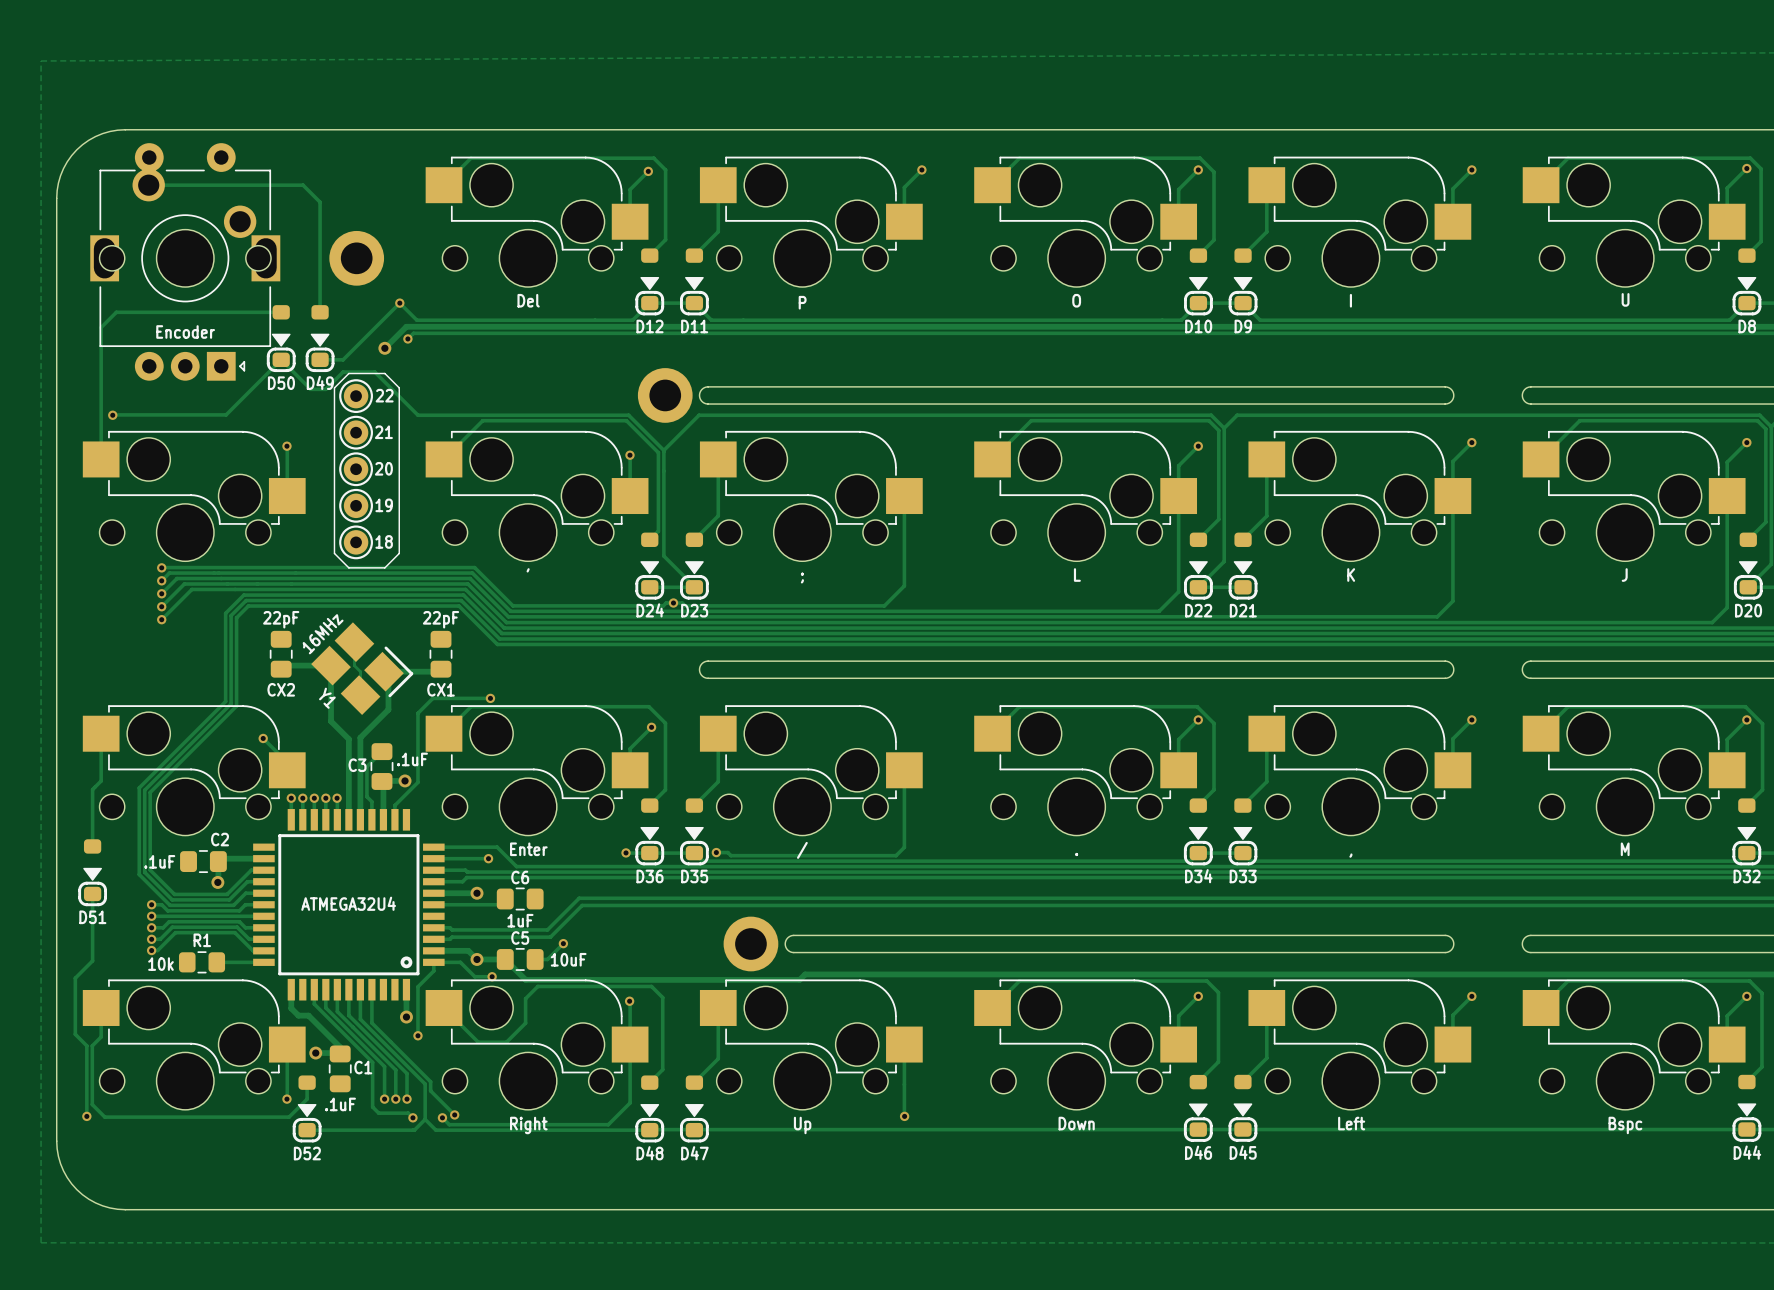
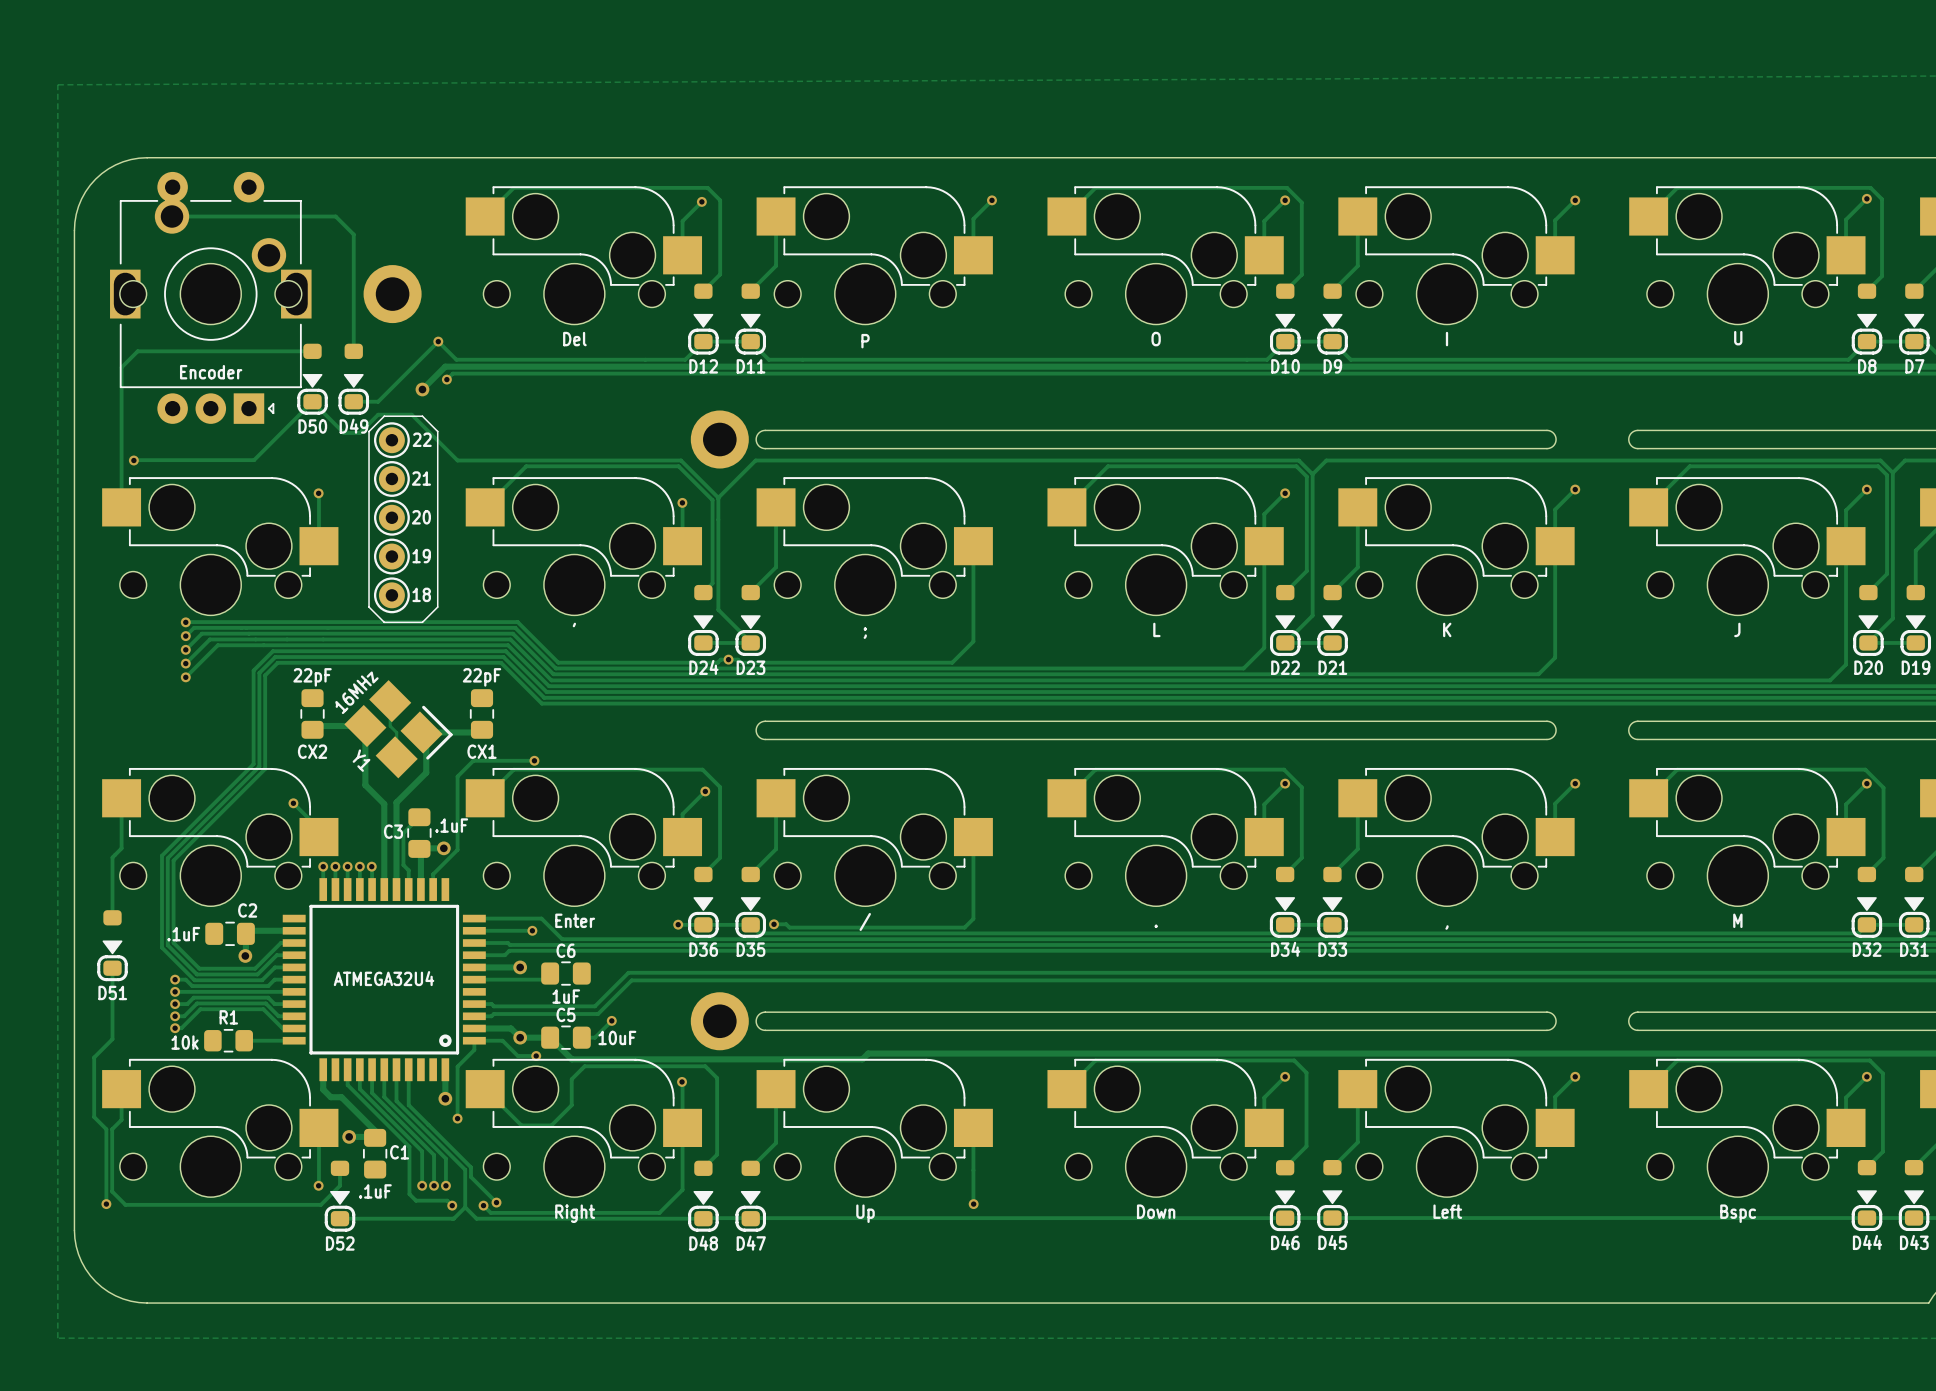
board edge: (793, 935) (787, 937) (785, 943) (787, 950) (793, 952) -> (856, 1012) (764, 1012) (758, 1015) (756, 1021) (758, 1026) (764, 1030) (856, 1030)
part position: (750, 943) -> (719, 1021)

